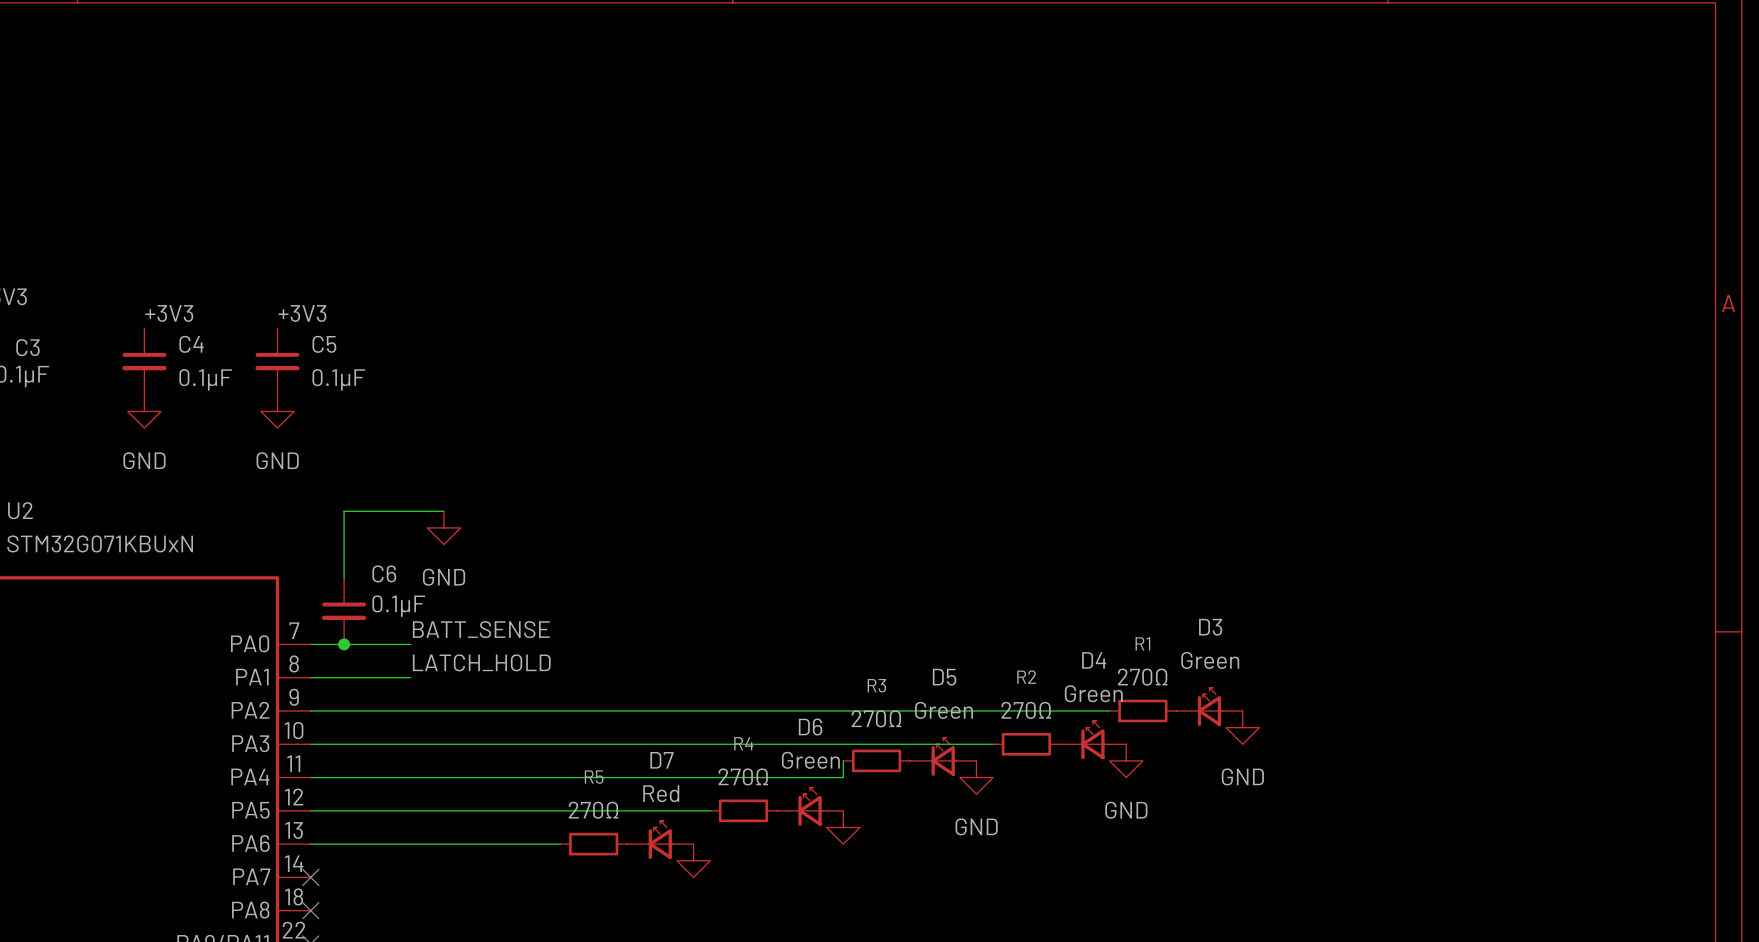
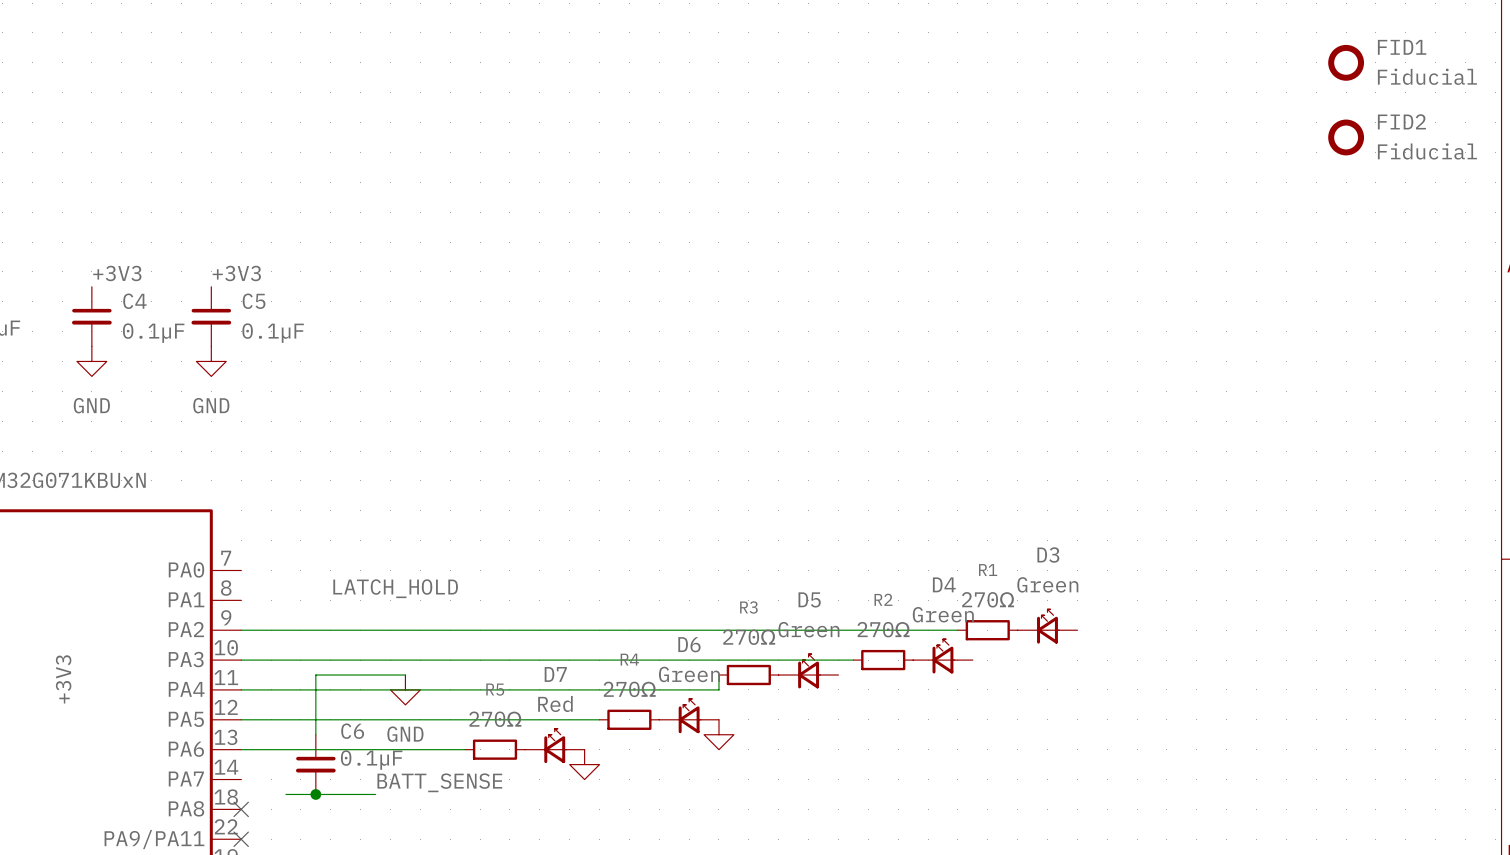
FID1: none -> Fiducial (1346, 62)
FID2: none -> Fiducial (1346, 137)
wire: (443, 511) (344, 511) (344, 577) -> (405, 675) (315, 675) (315, 734)
power symbol: GND (443, 527) -> none
C6 position: (344, 611) -> (315, 764)
label position: BATT_SENSE (481, 629) -> BATT_SENSE (439, 782)
wire: (310, 644) (410, 644) -> none
junction: (344, 644) -> none
wire: (310, 677) (410, 677) -> (285, 794) (375, 794)
power symbol: GND (1242, 727) -> none
power symbol: GND (1126, 760) -> none
label: none -> +3V3 (63, 679)
power symbol: none -> GND (405, 689)
power symbol: GND (976, 777) -> none
no-connect mark: (310, 877) -> none
junction: none -> (315, 794)

